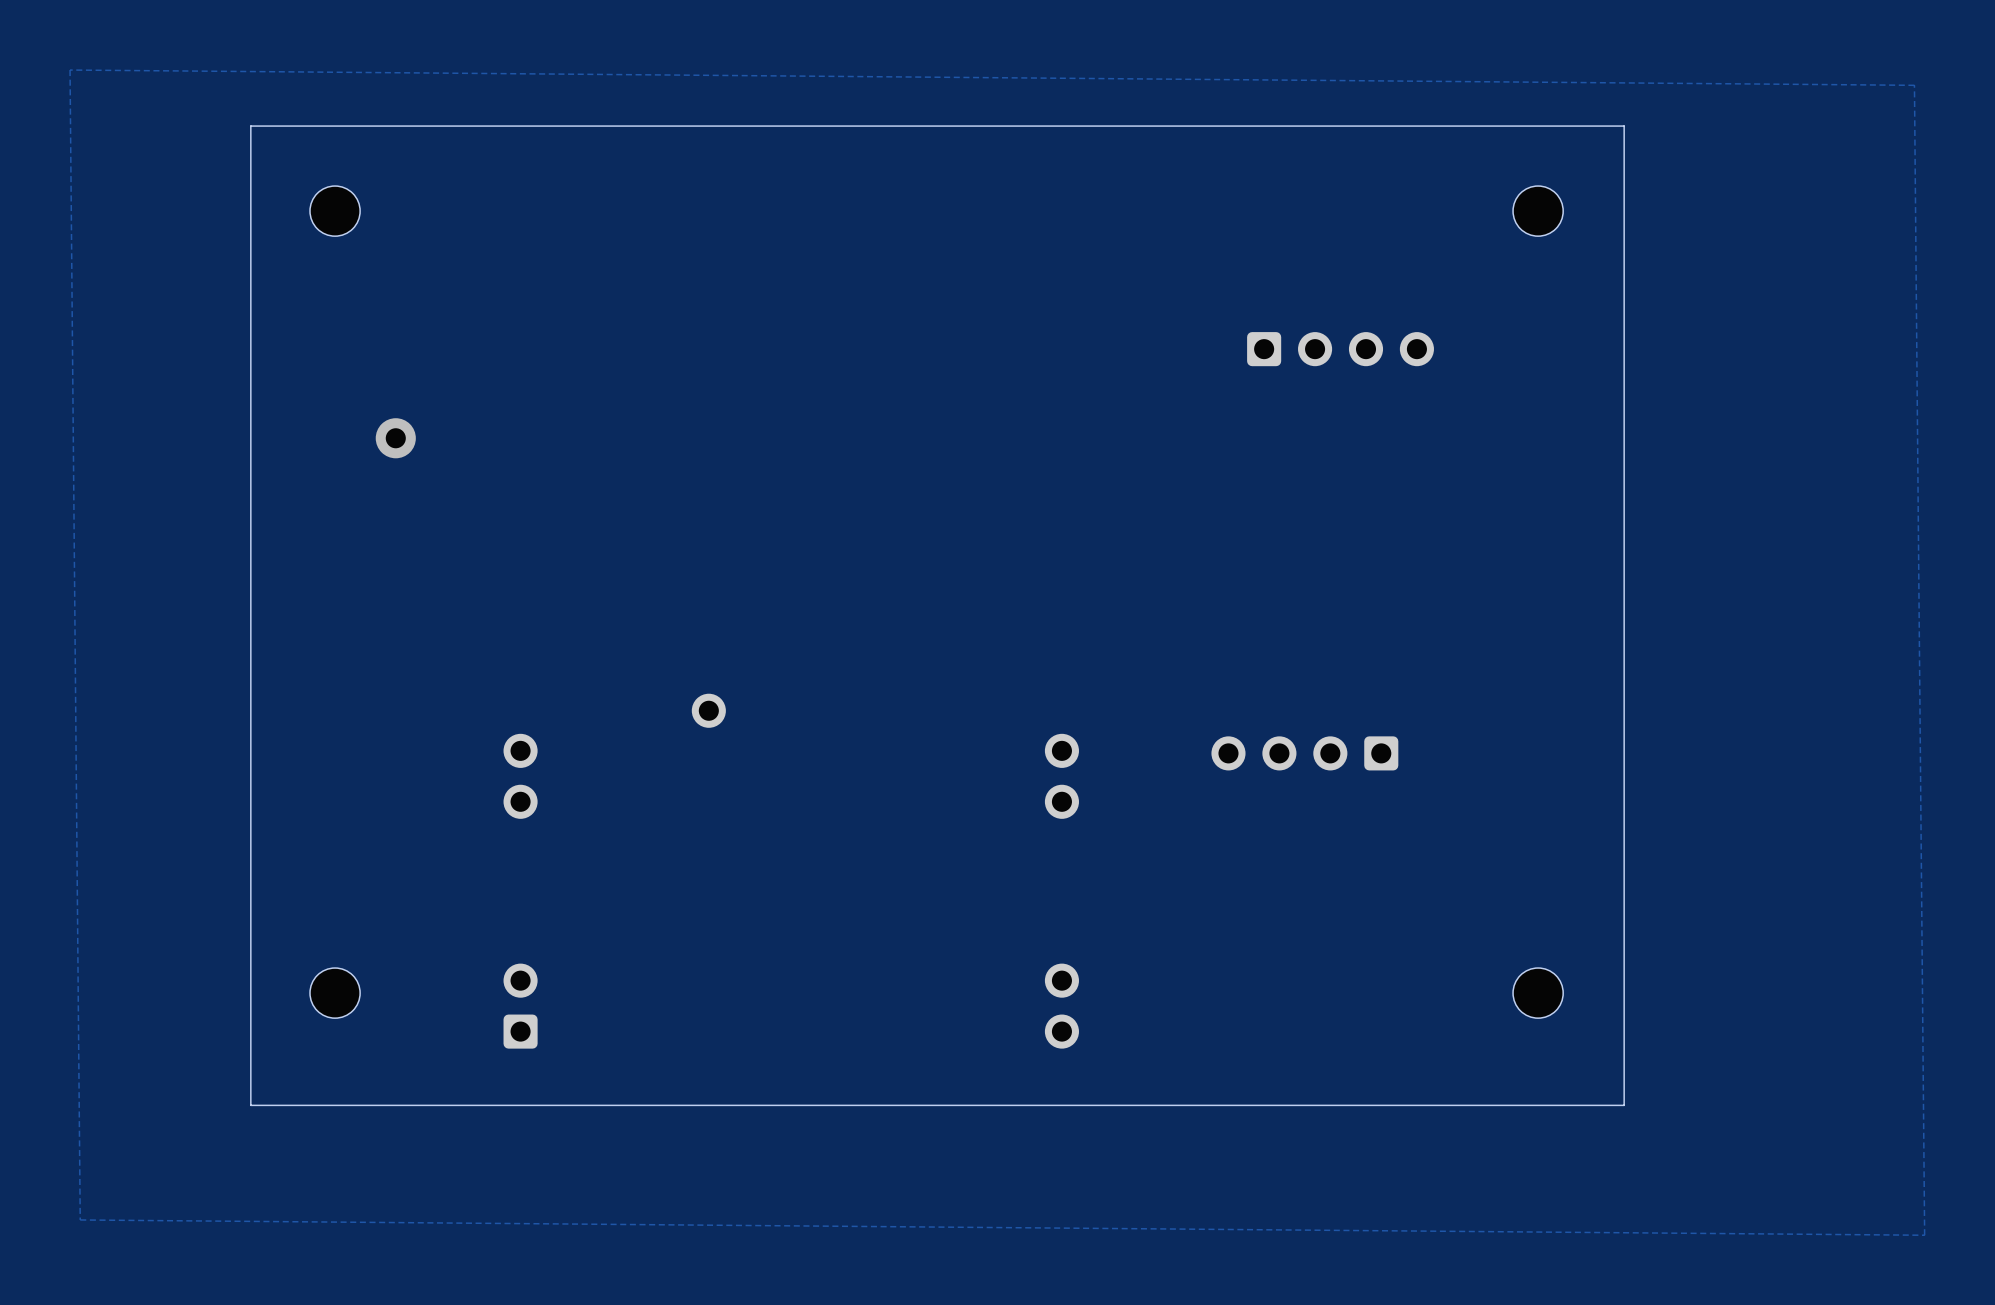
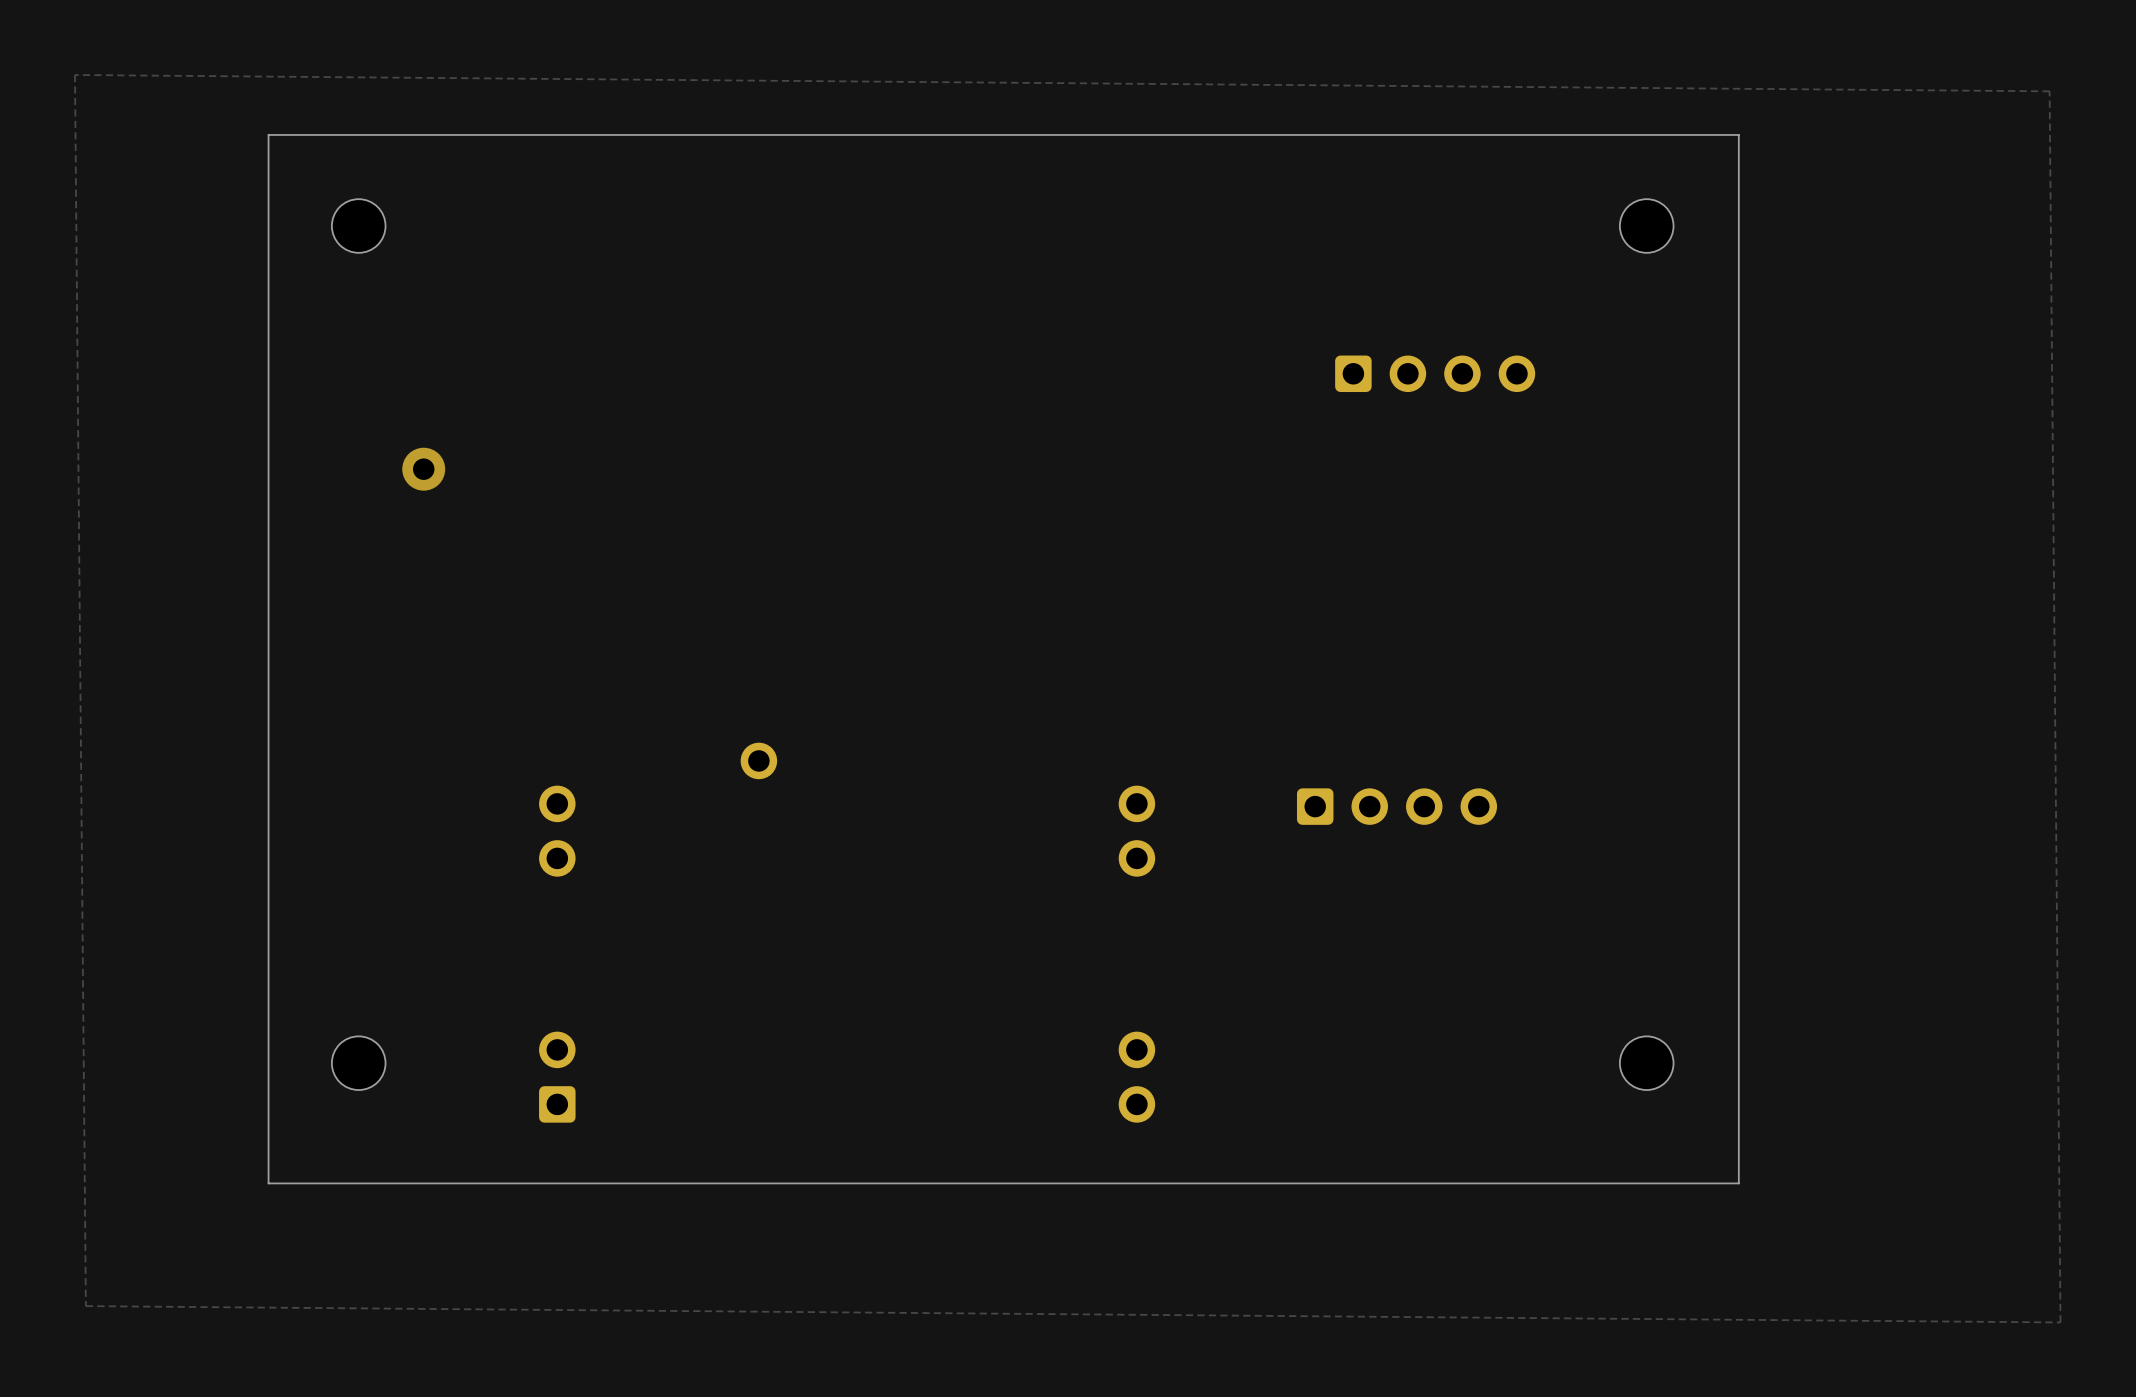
part rotation: 0° (1304, 753) -> 180° (1397, 806)

